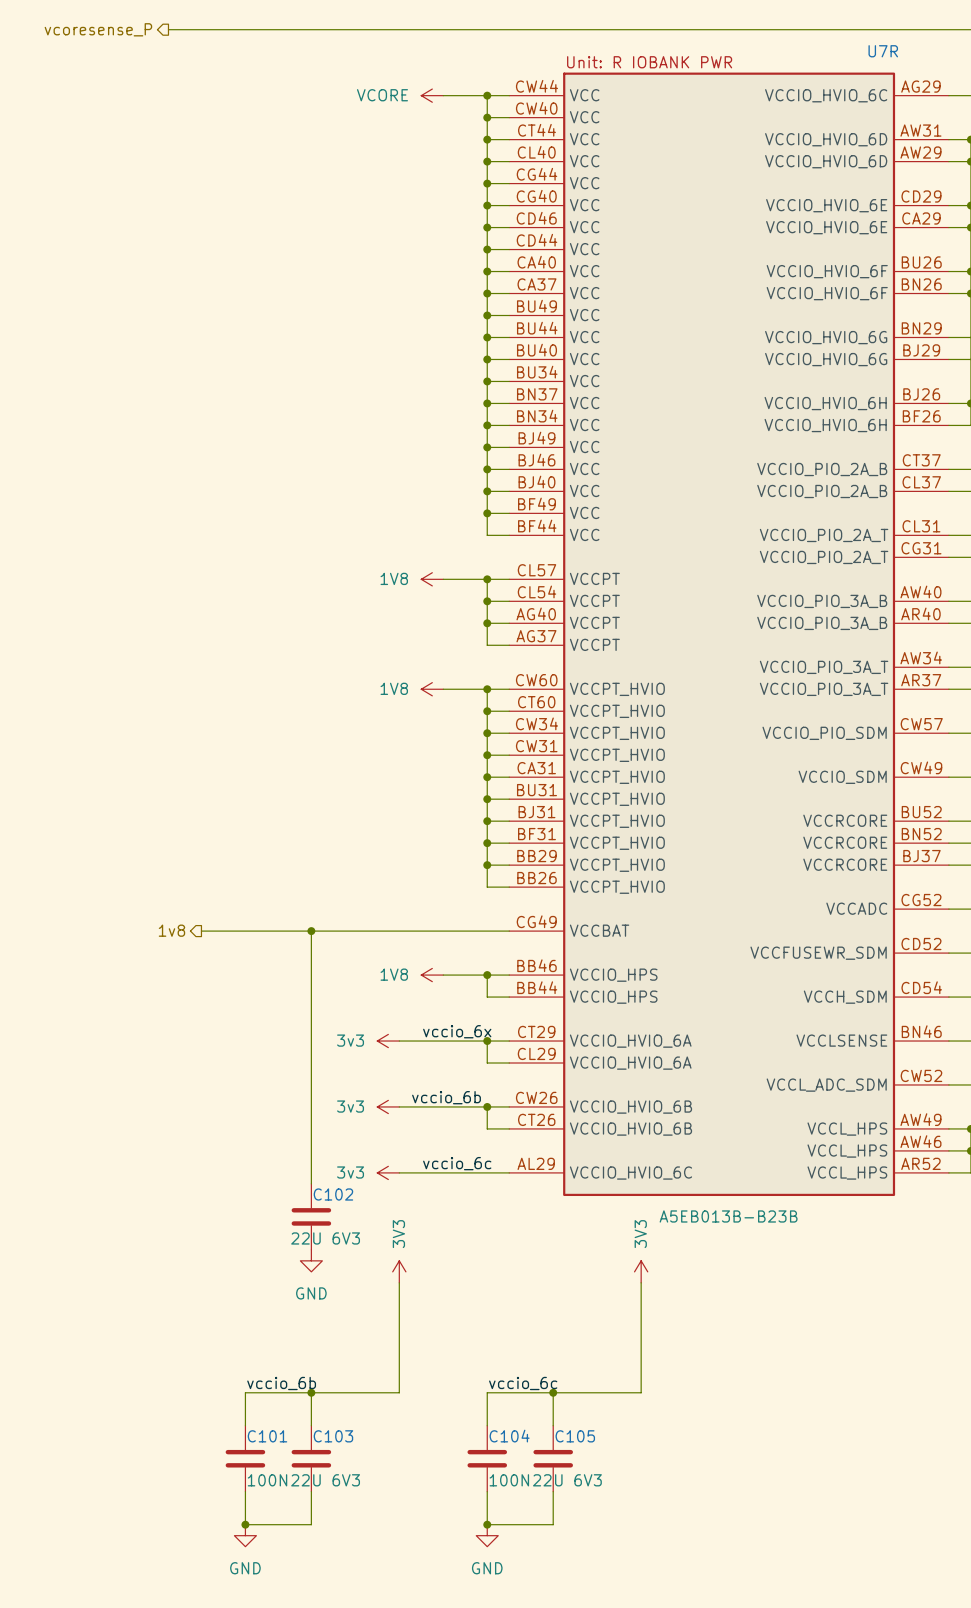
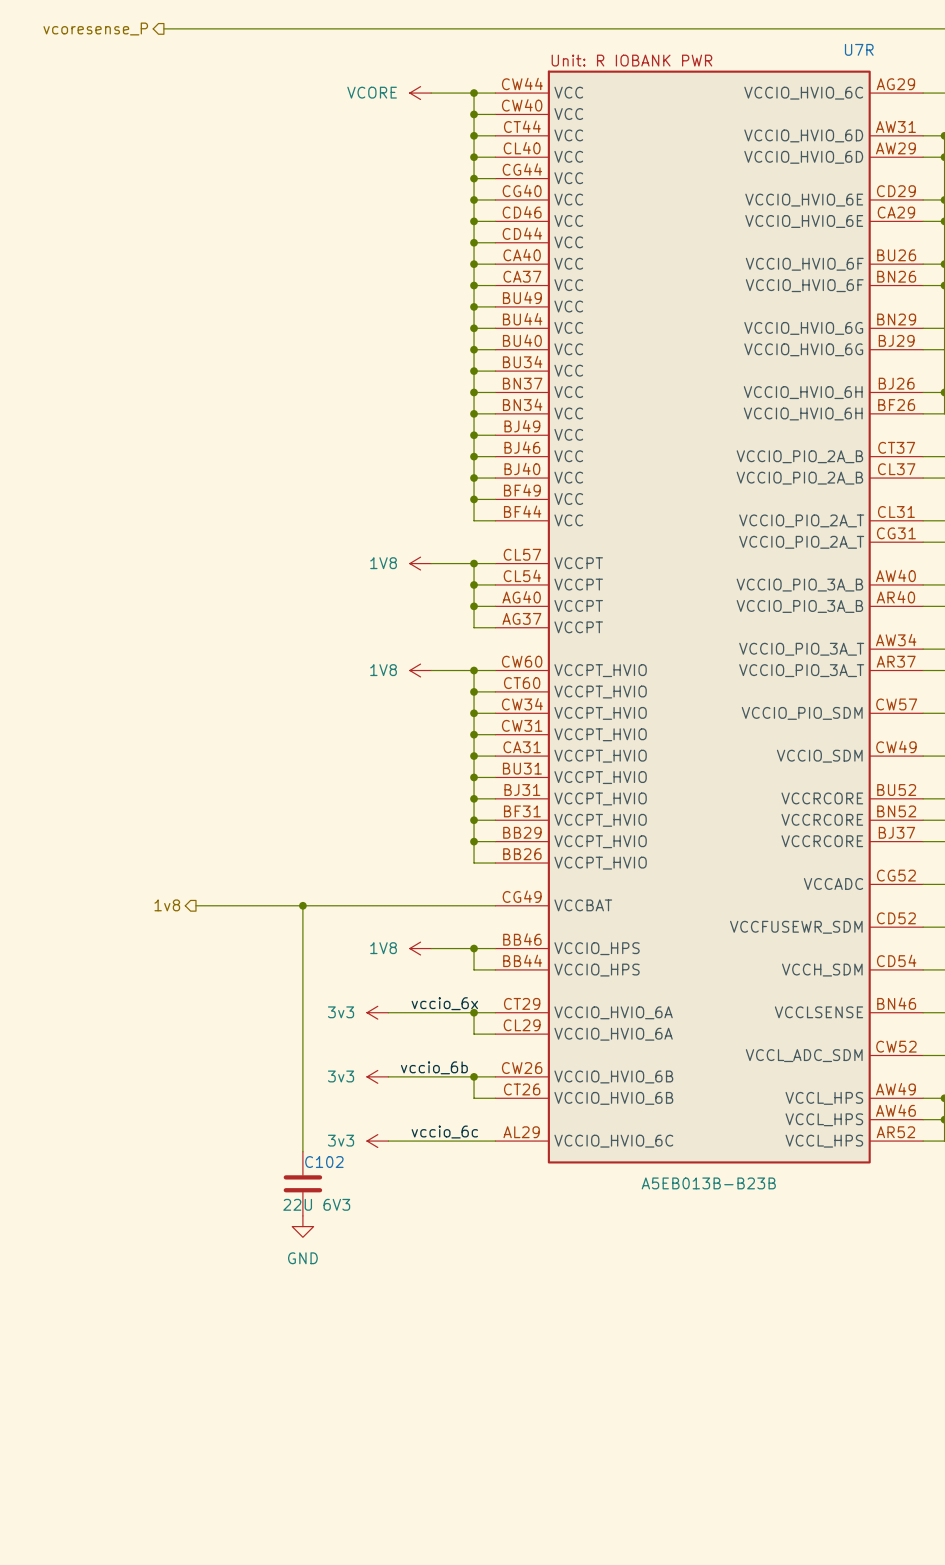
power symbol: 3V3 (399, 1271) -> none
power symbol: 3V3 (641, 1271) -> none
wire: (399, 1282) (399, 1392) (245, 1392) (245, 1425) -> none
wire: (641, 1282) (641, 1392) (487, 1392) (487, 1425) -> none
label: vccio_6b (281, 1383) -> none
label: vccio_6c (523, 1383) -> none
wire: (311, 1392) (311, 1425) -> none
junction: (311, 1392) -> none
wire: (553, 1392) (553, 1425) -> none
junction: (553, 1392) -> none
C101: 100N (245, 1458) -> none
C103: 22U 6V3 (311, 1458) -> none
C104: 100N (487, 1458) -> none
C105: 22U 6V3 (553, 1458) -> none
wire: (245, 1491) (245, 1524) (311, 1524) (311, 1491) -> none
wire: (487, 1491) (487, 1524) (553, 1524) (553, 1491) -> none
junction: (245, 1524) -> none
junction: (487, 1524) -> none
power symbol: GND (245, 1535) -> none
power symbol: GND (487, 1535) -> none

